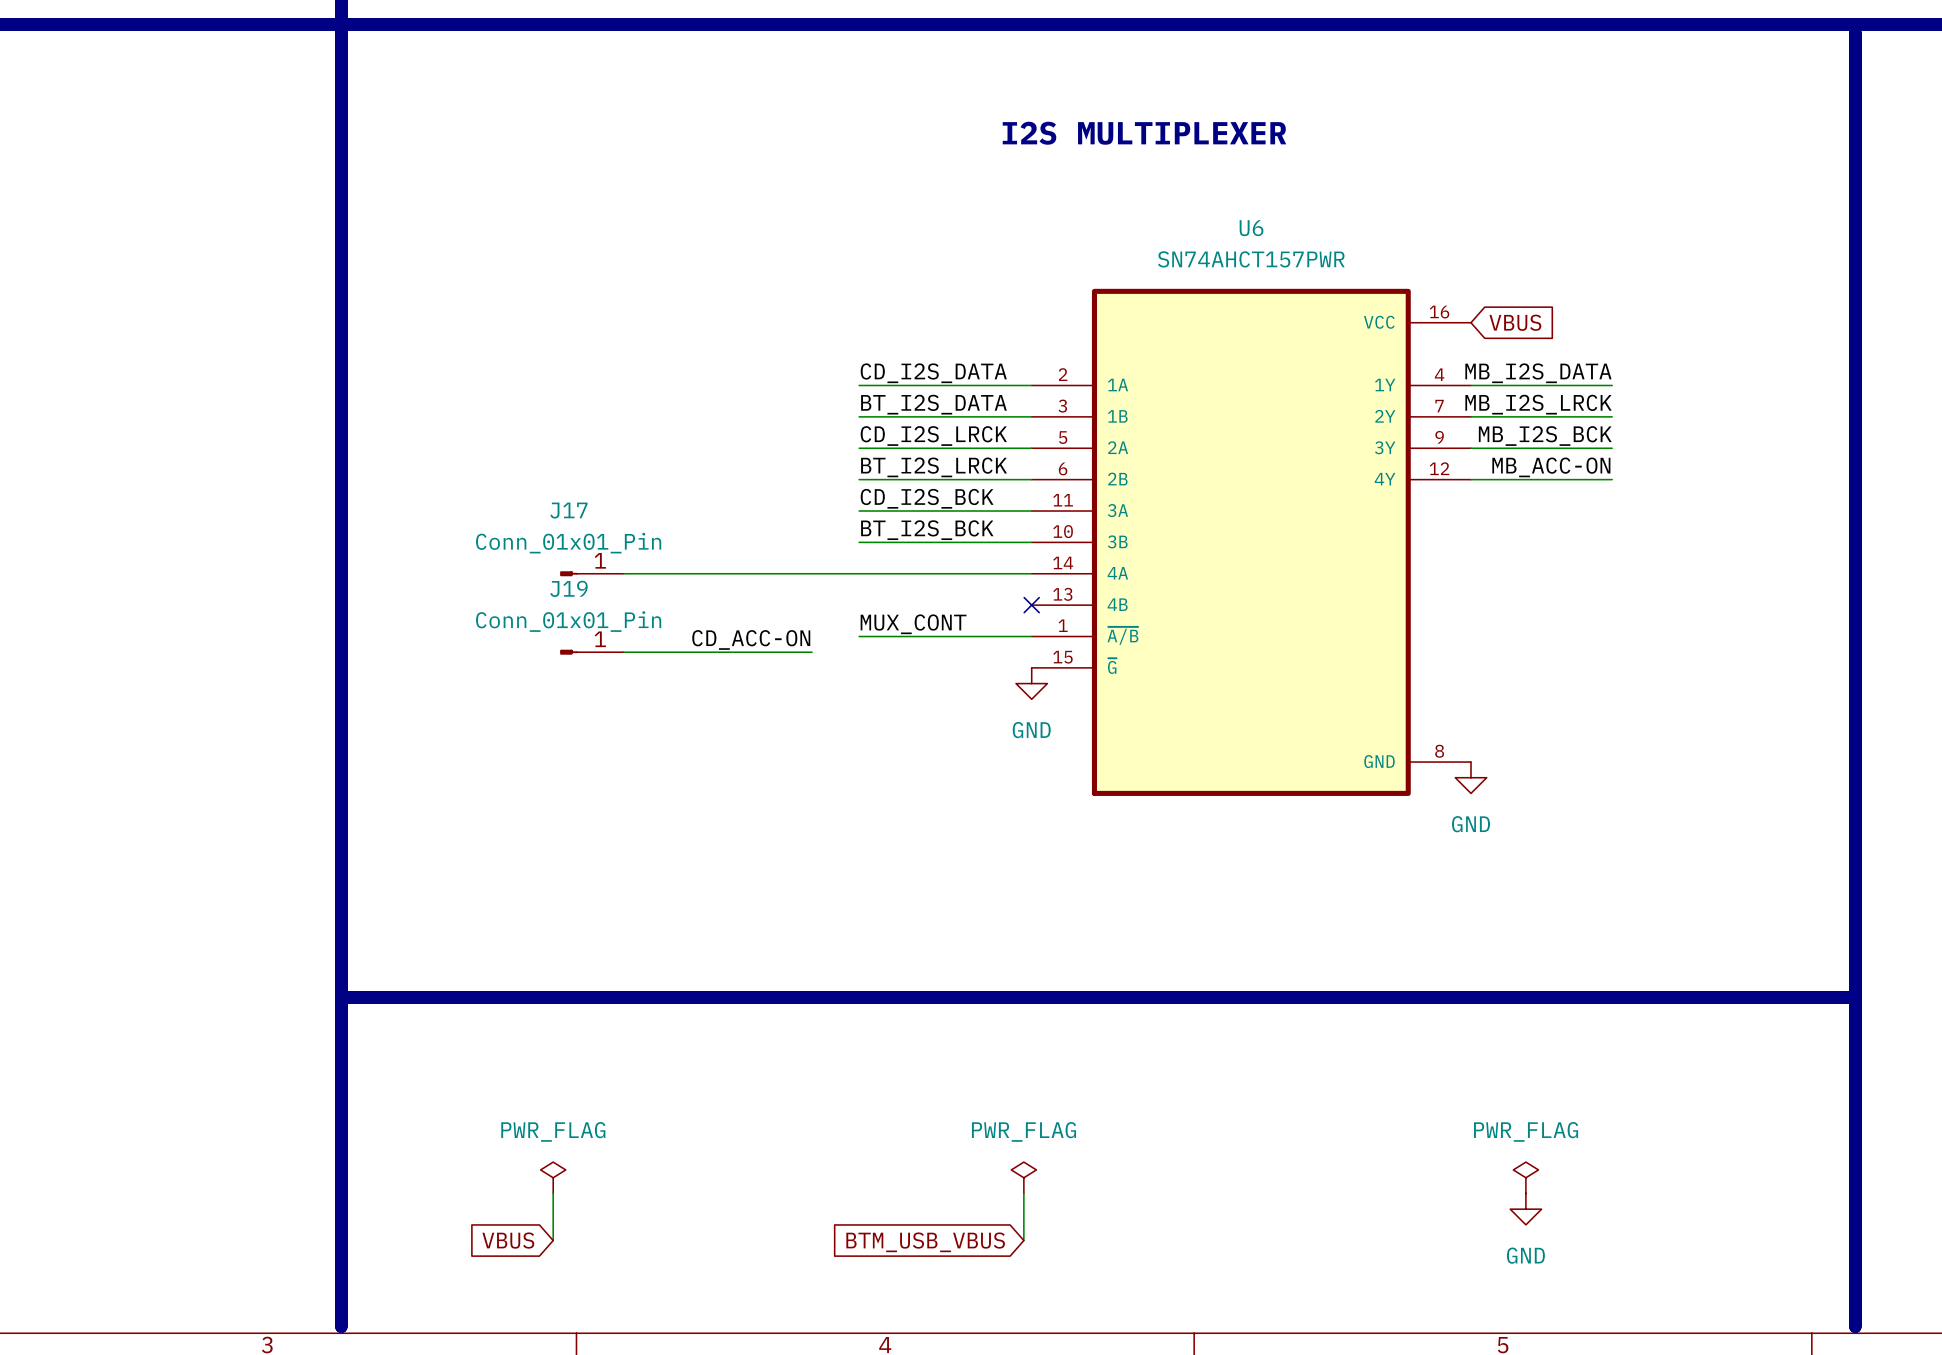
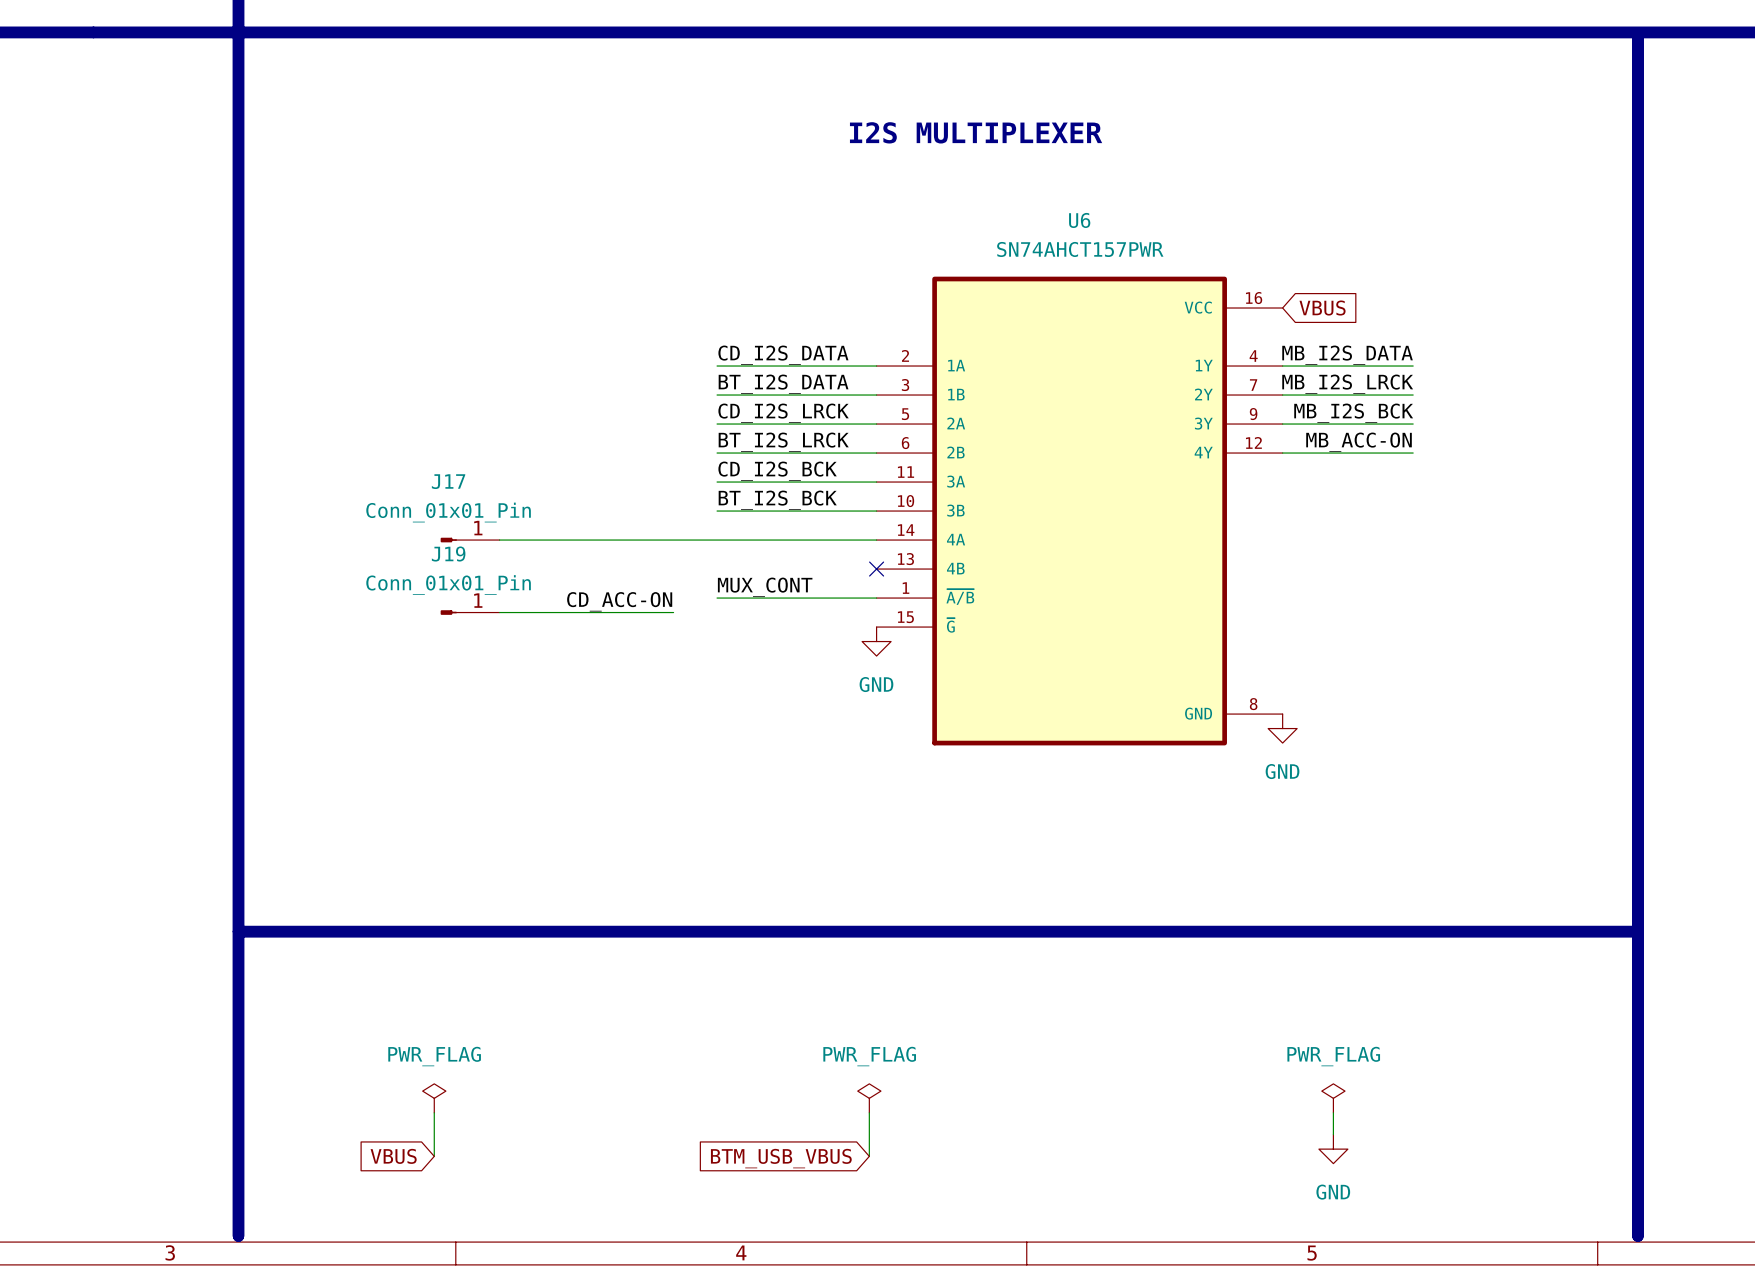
power symbol position: GND (1525, 1209) -> GND (1333, 1149)

